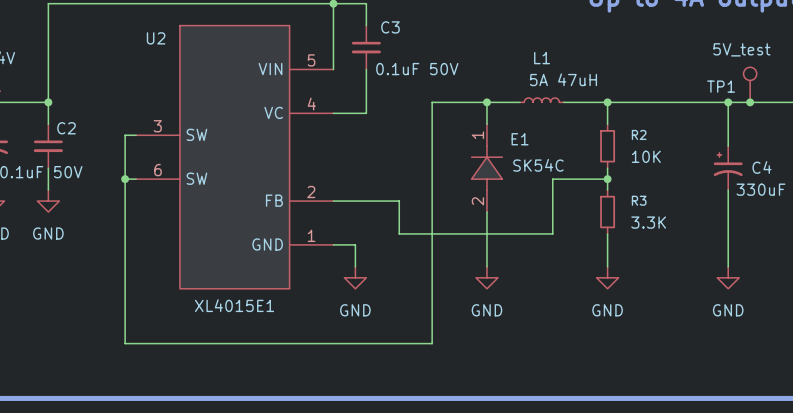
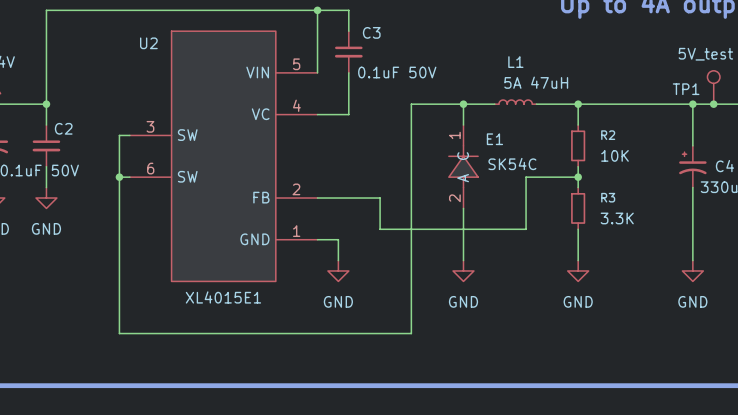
E1 pin name: none -> C (463, 156)
E1 pin name: none -> A (463, 178)

